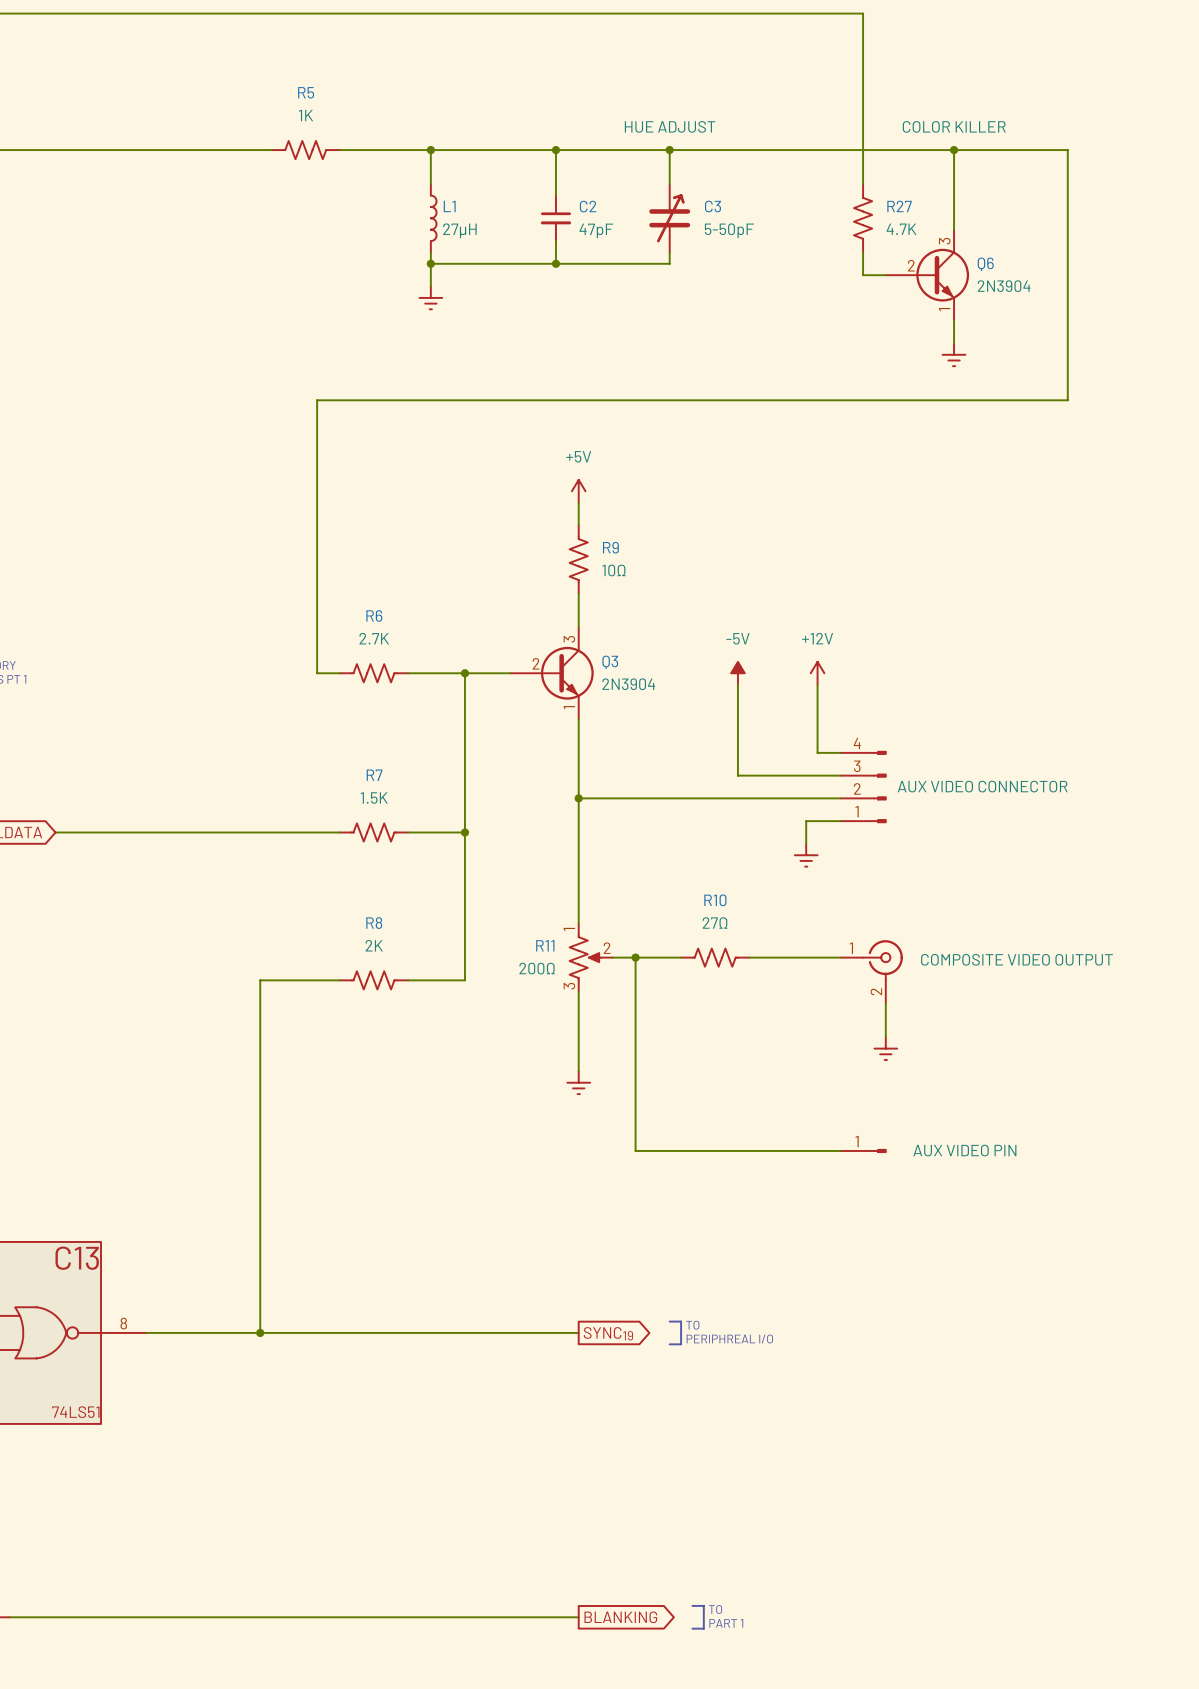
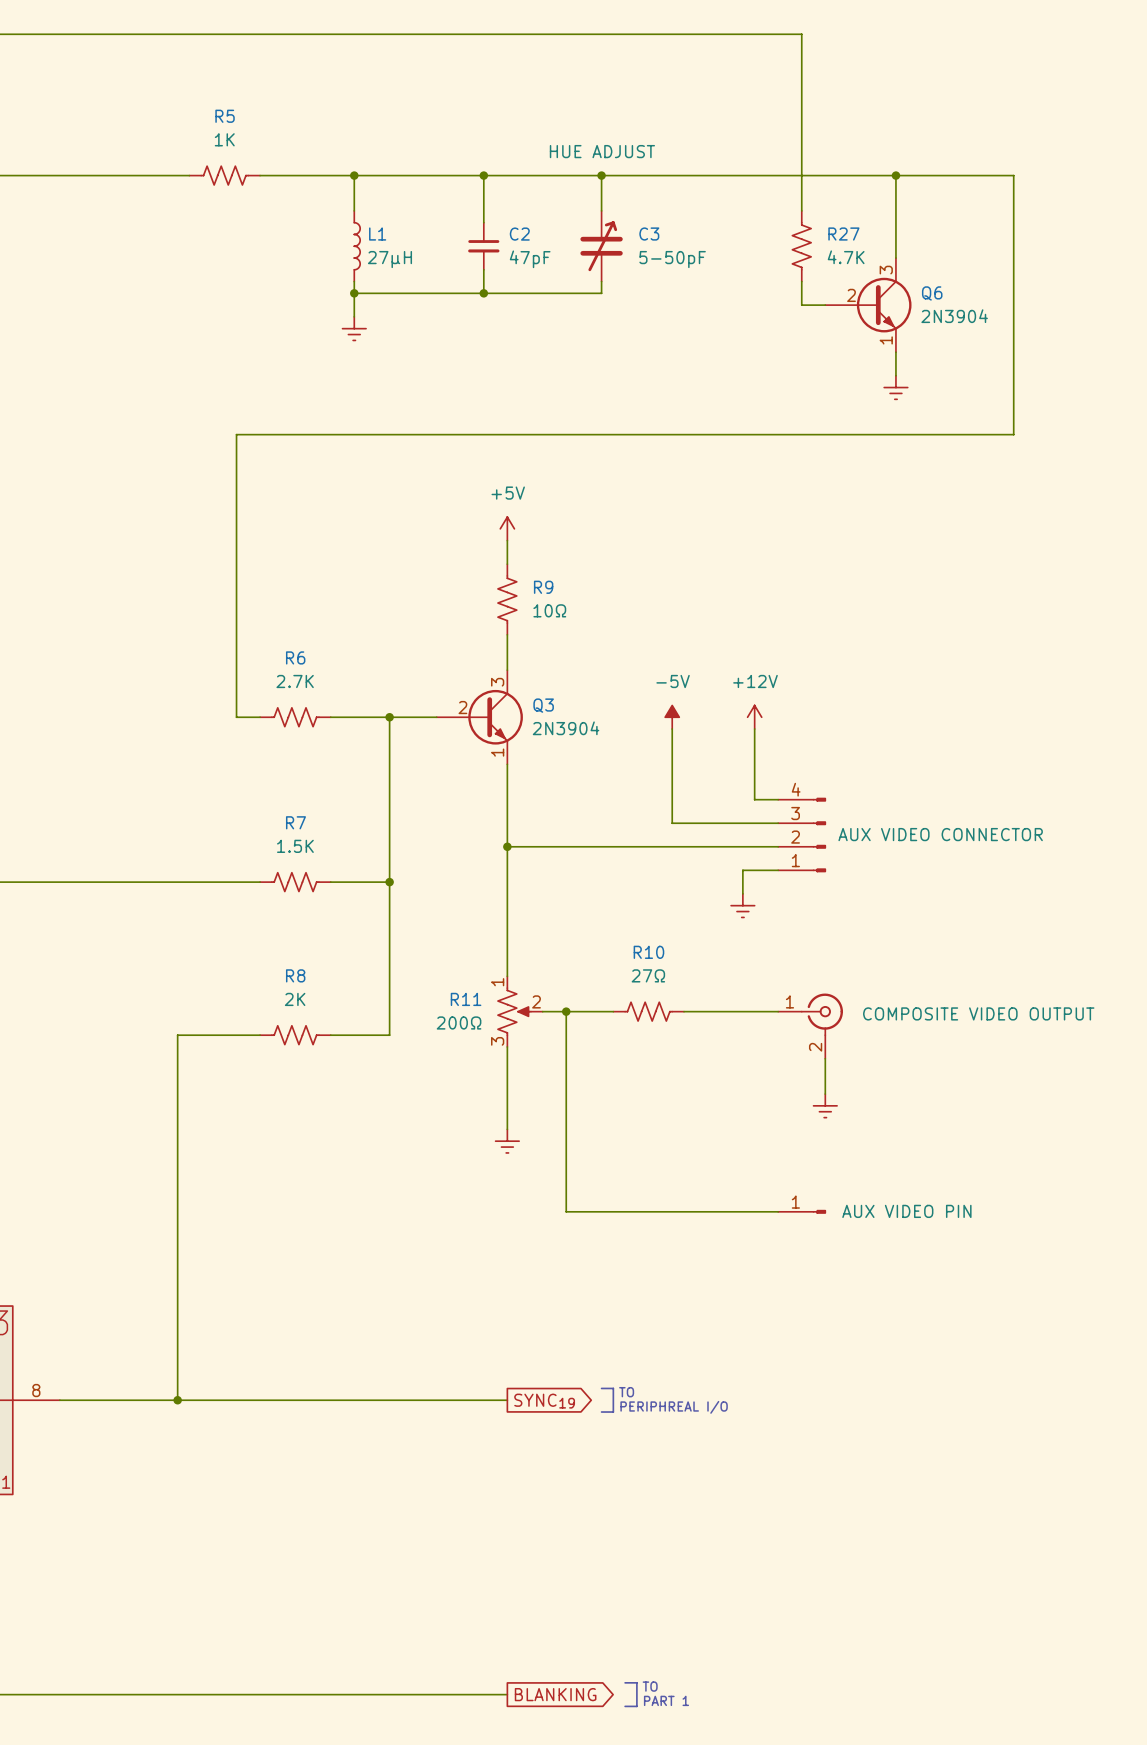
Q6 text: COLOR KILLER (954, 126) -> none

